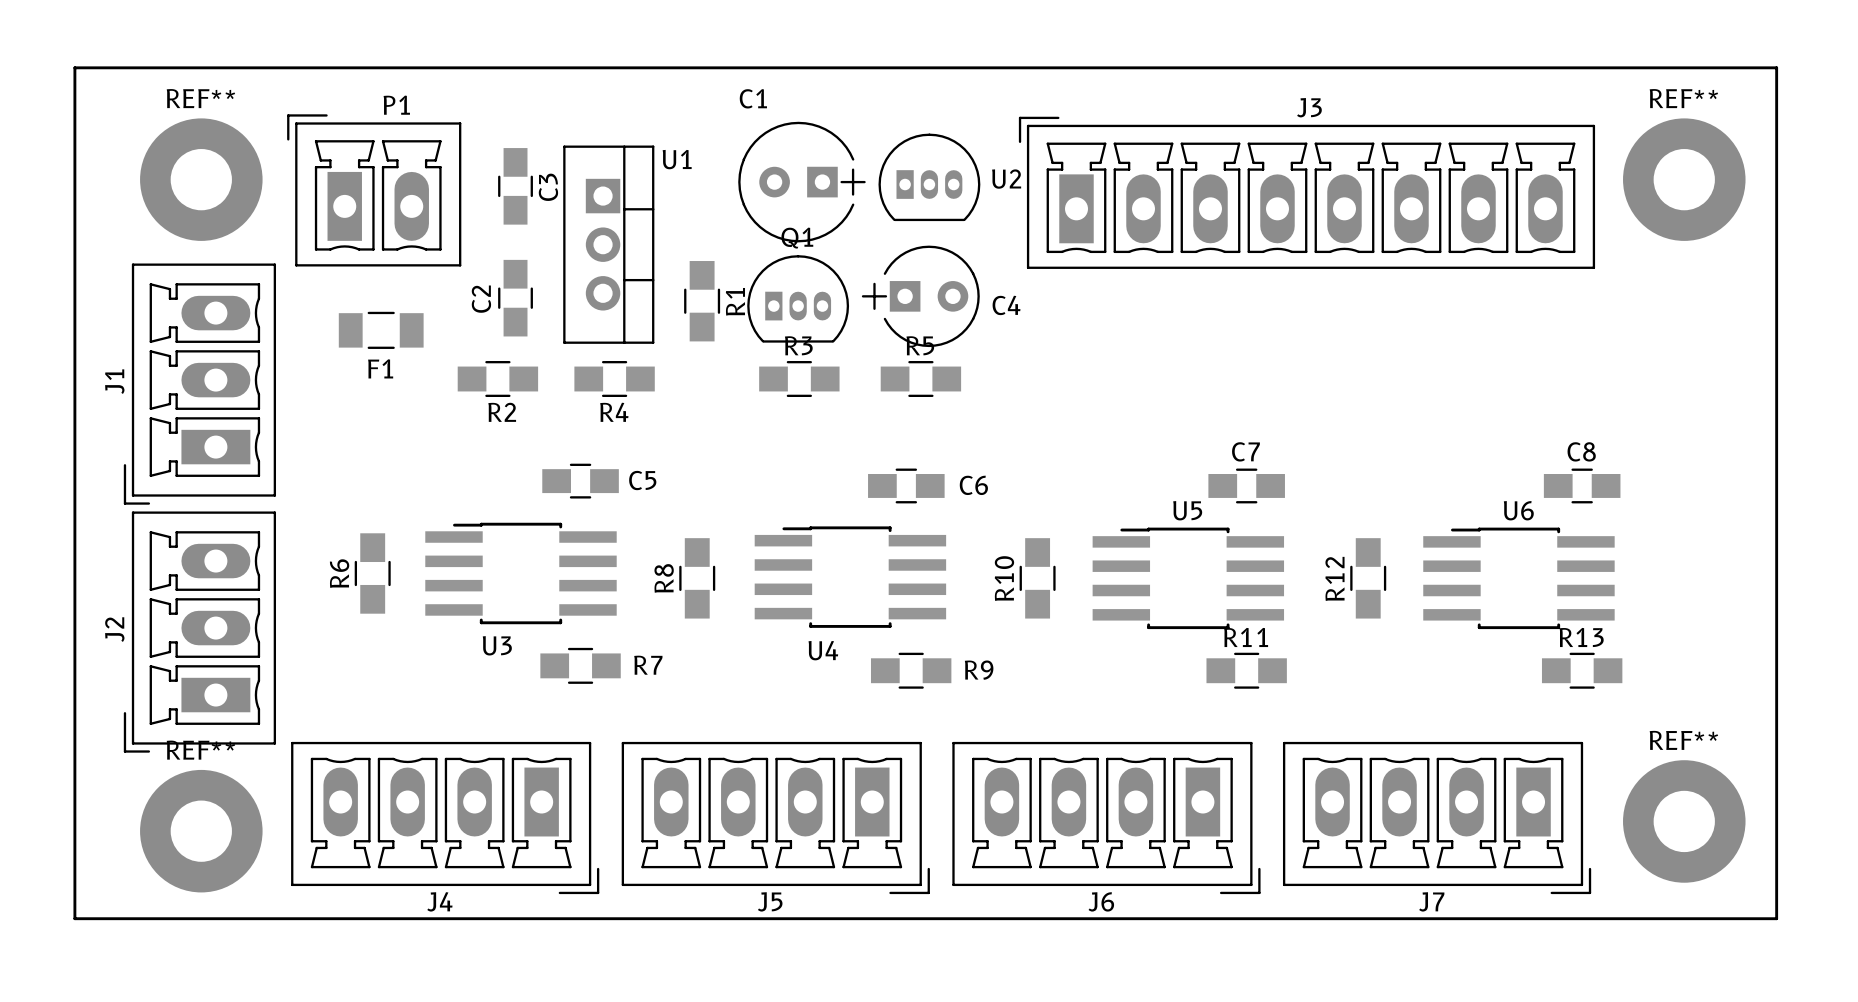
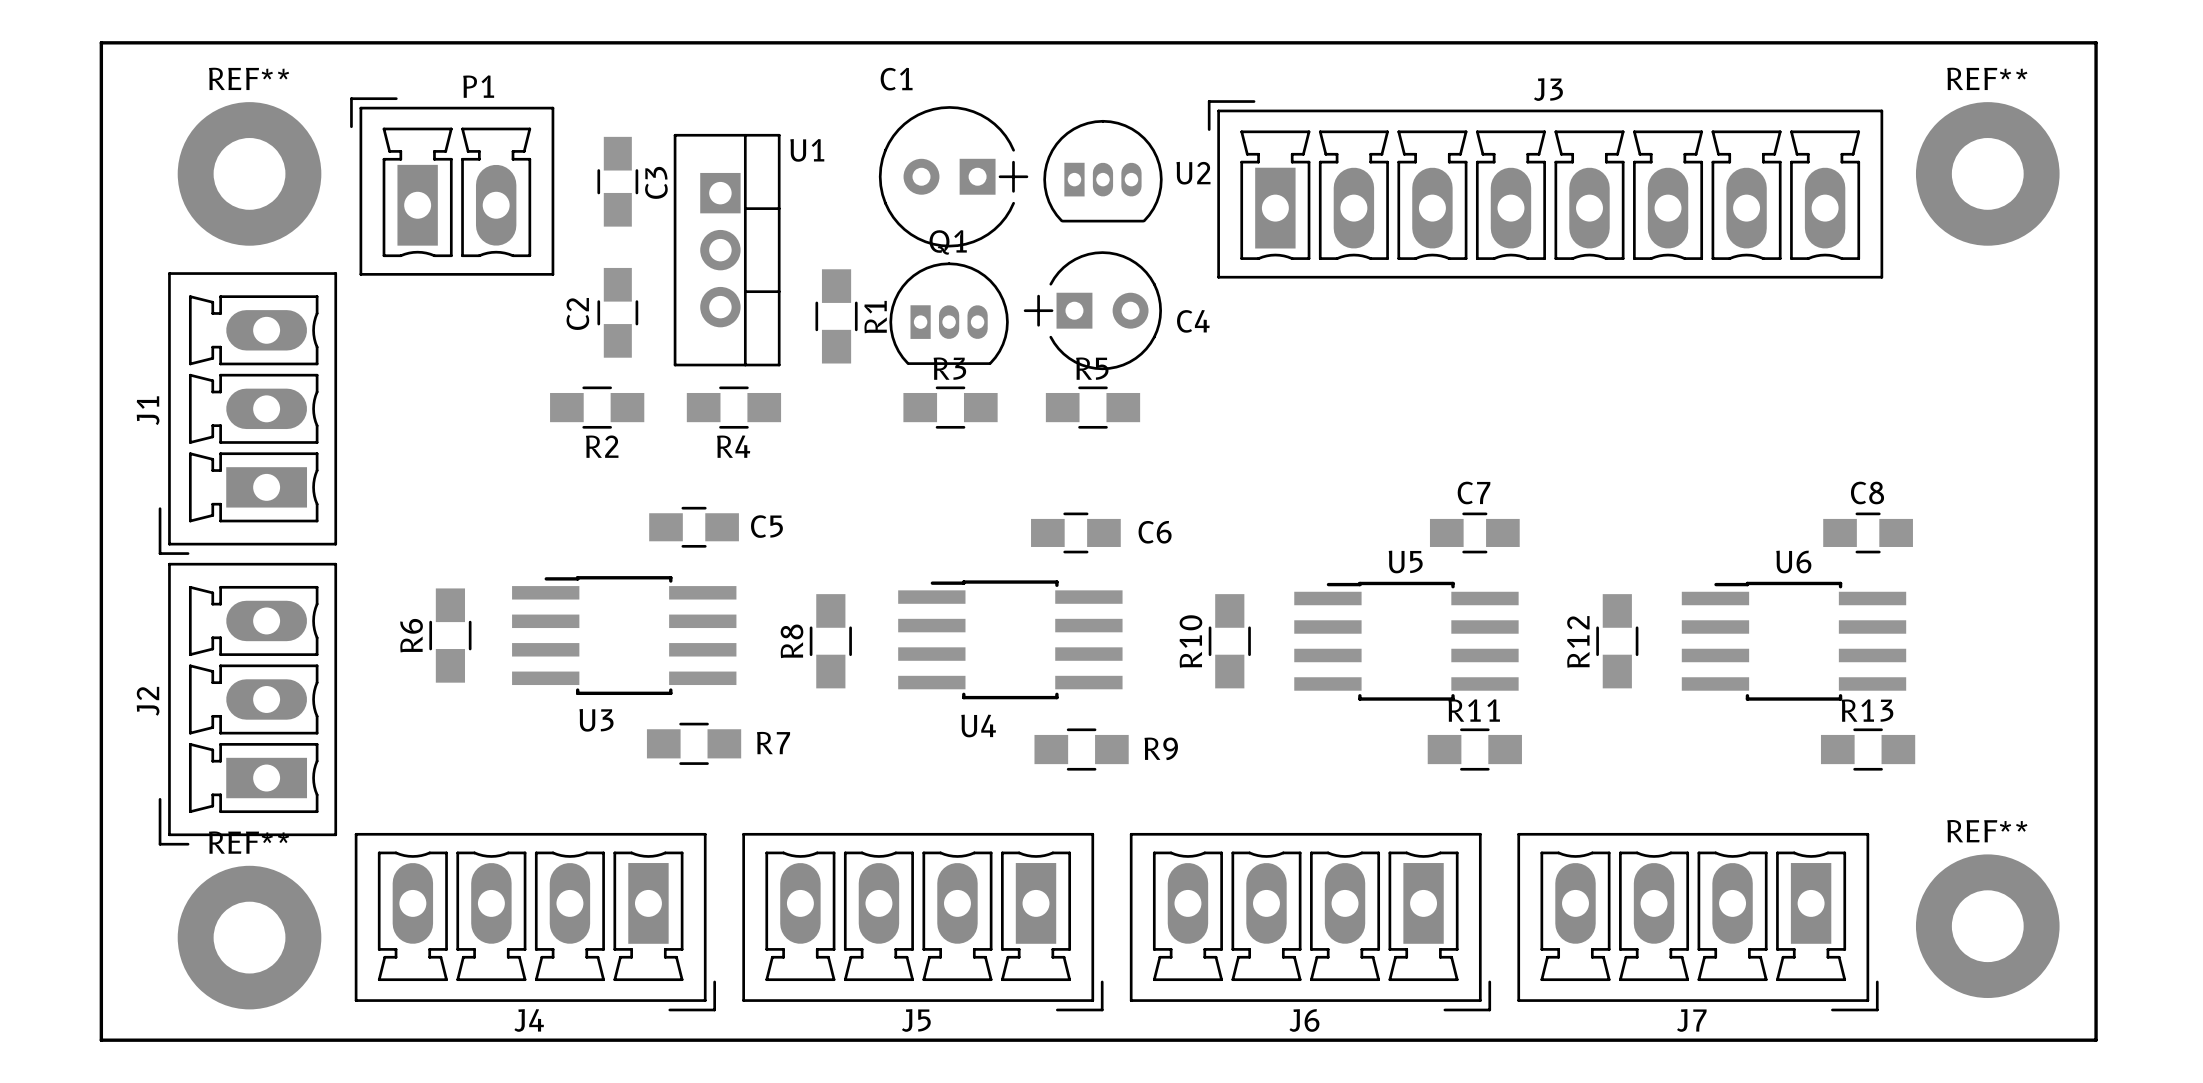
F1: (381, 330) -> none

